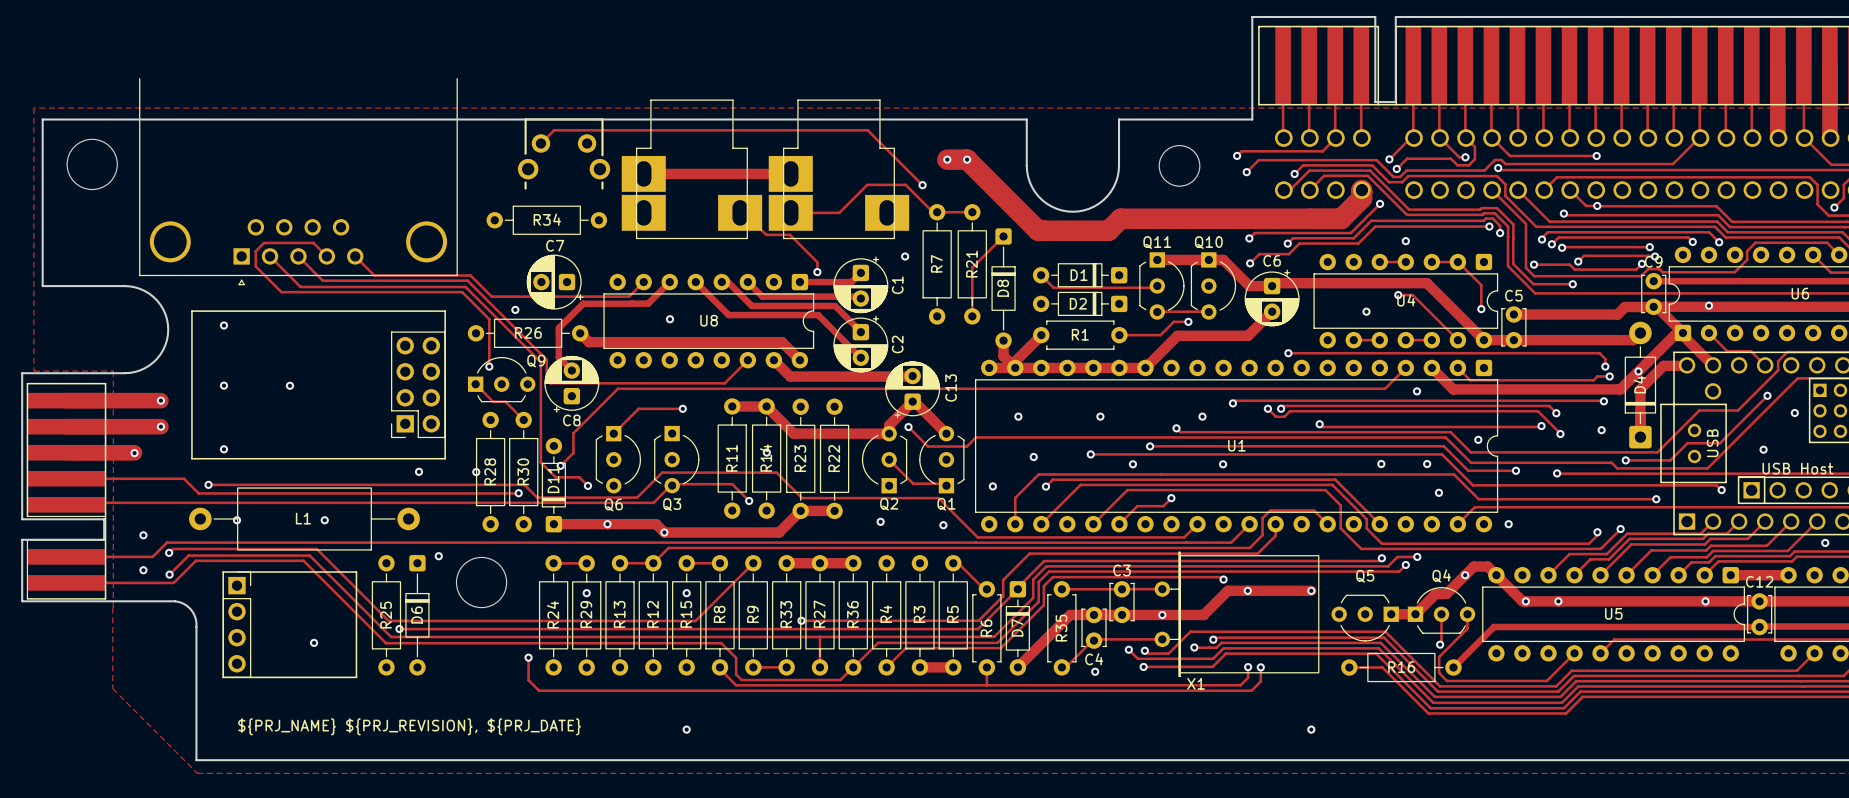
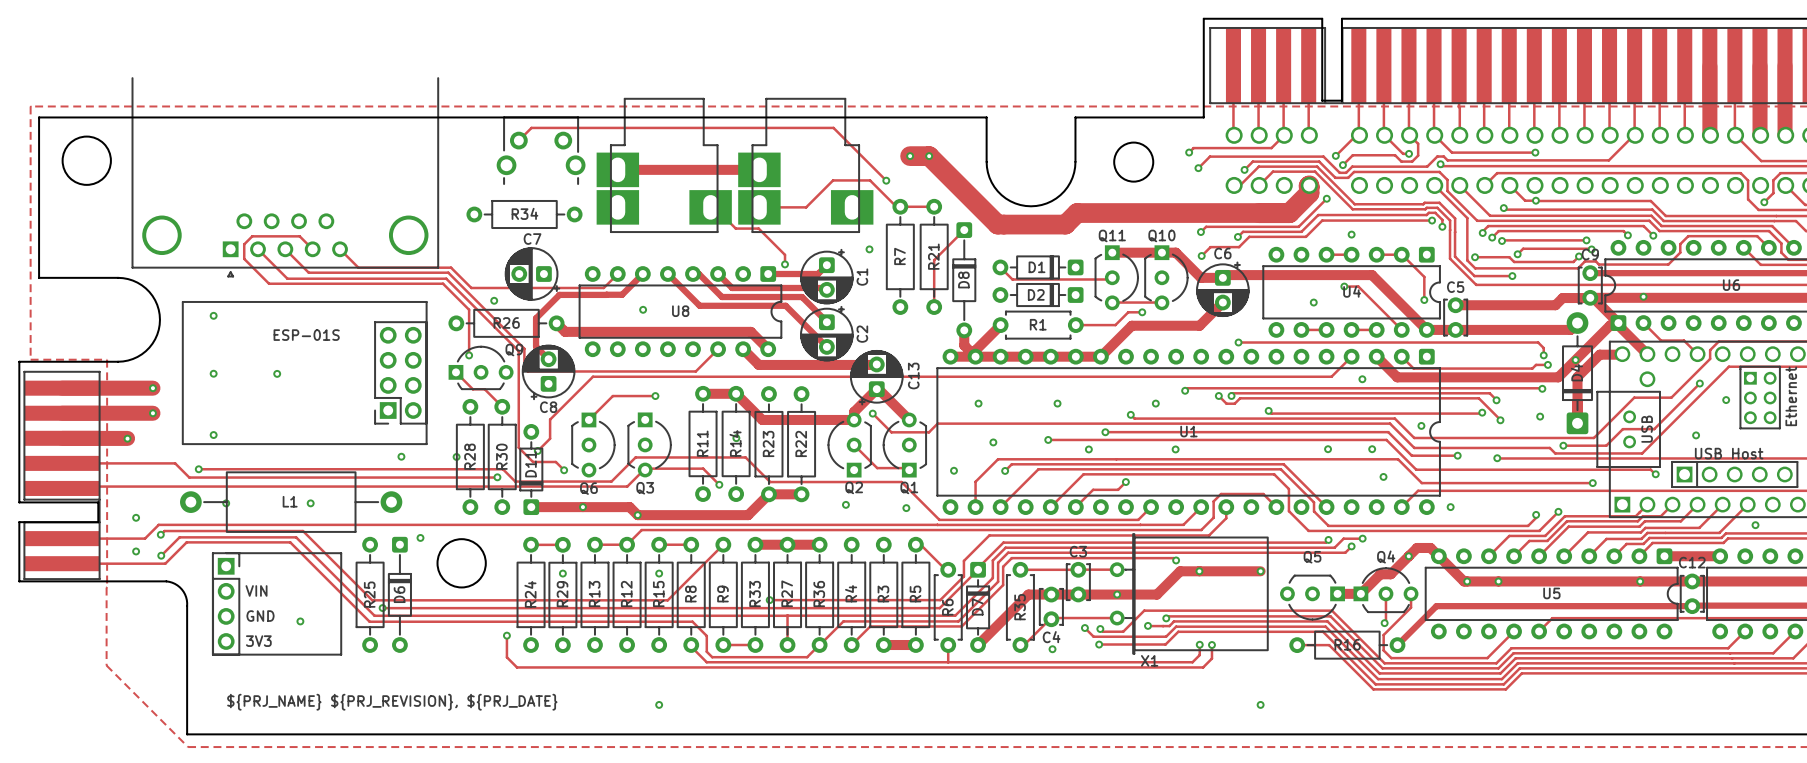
text: none -> ESP-01S (306, 335)
text: none -> VIN (256, 590)
text: none -> GND (260, 616)
text: none -> 3V3 (258, 641)

